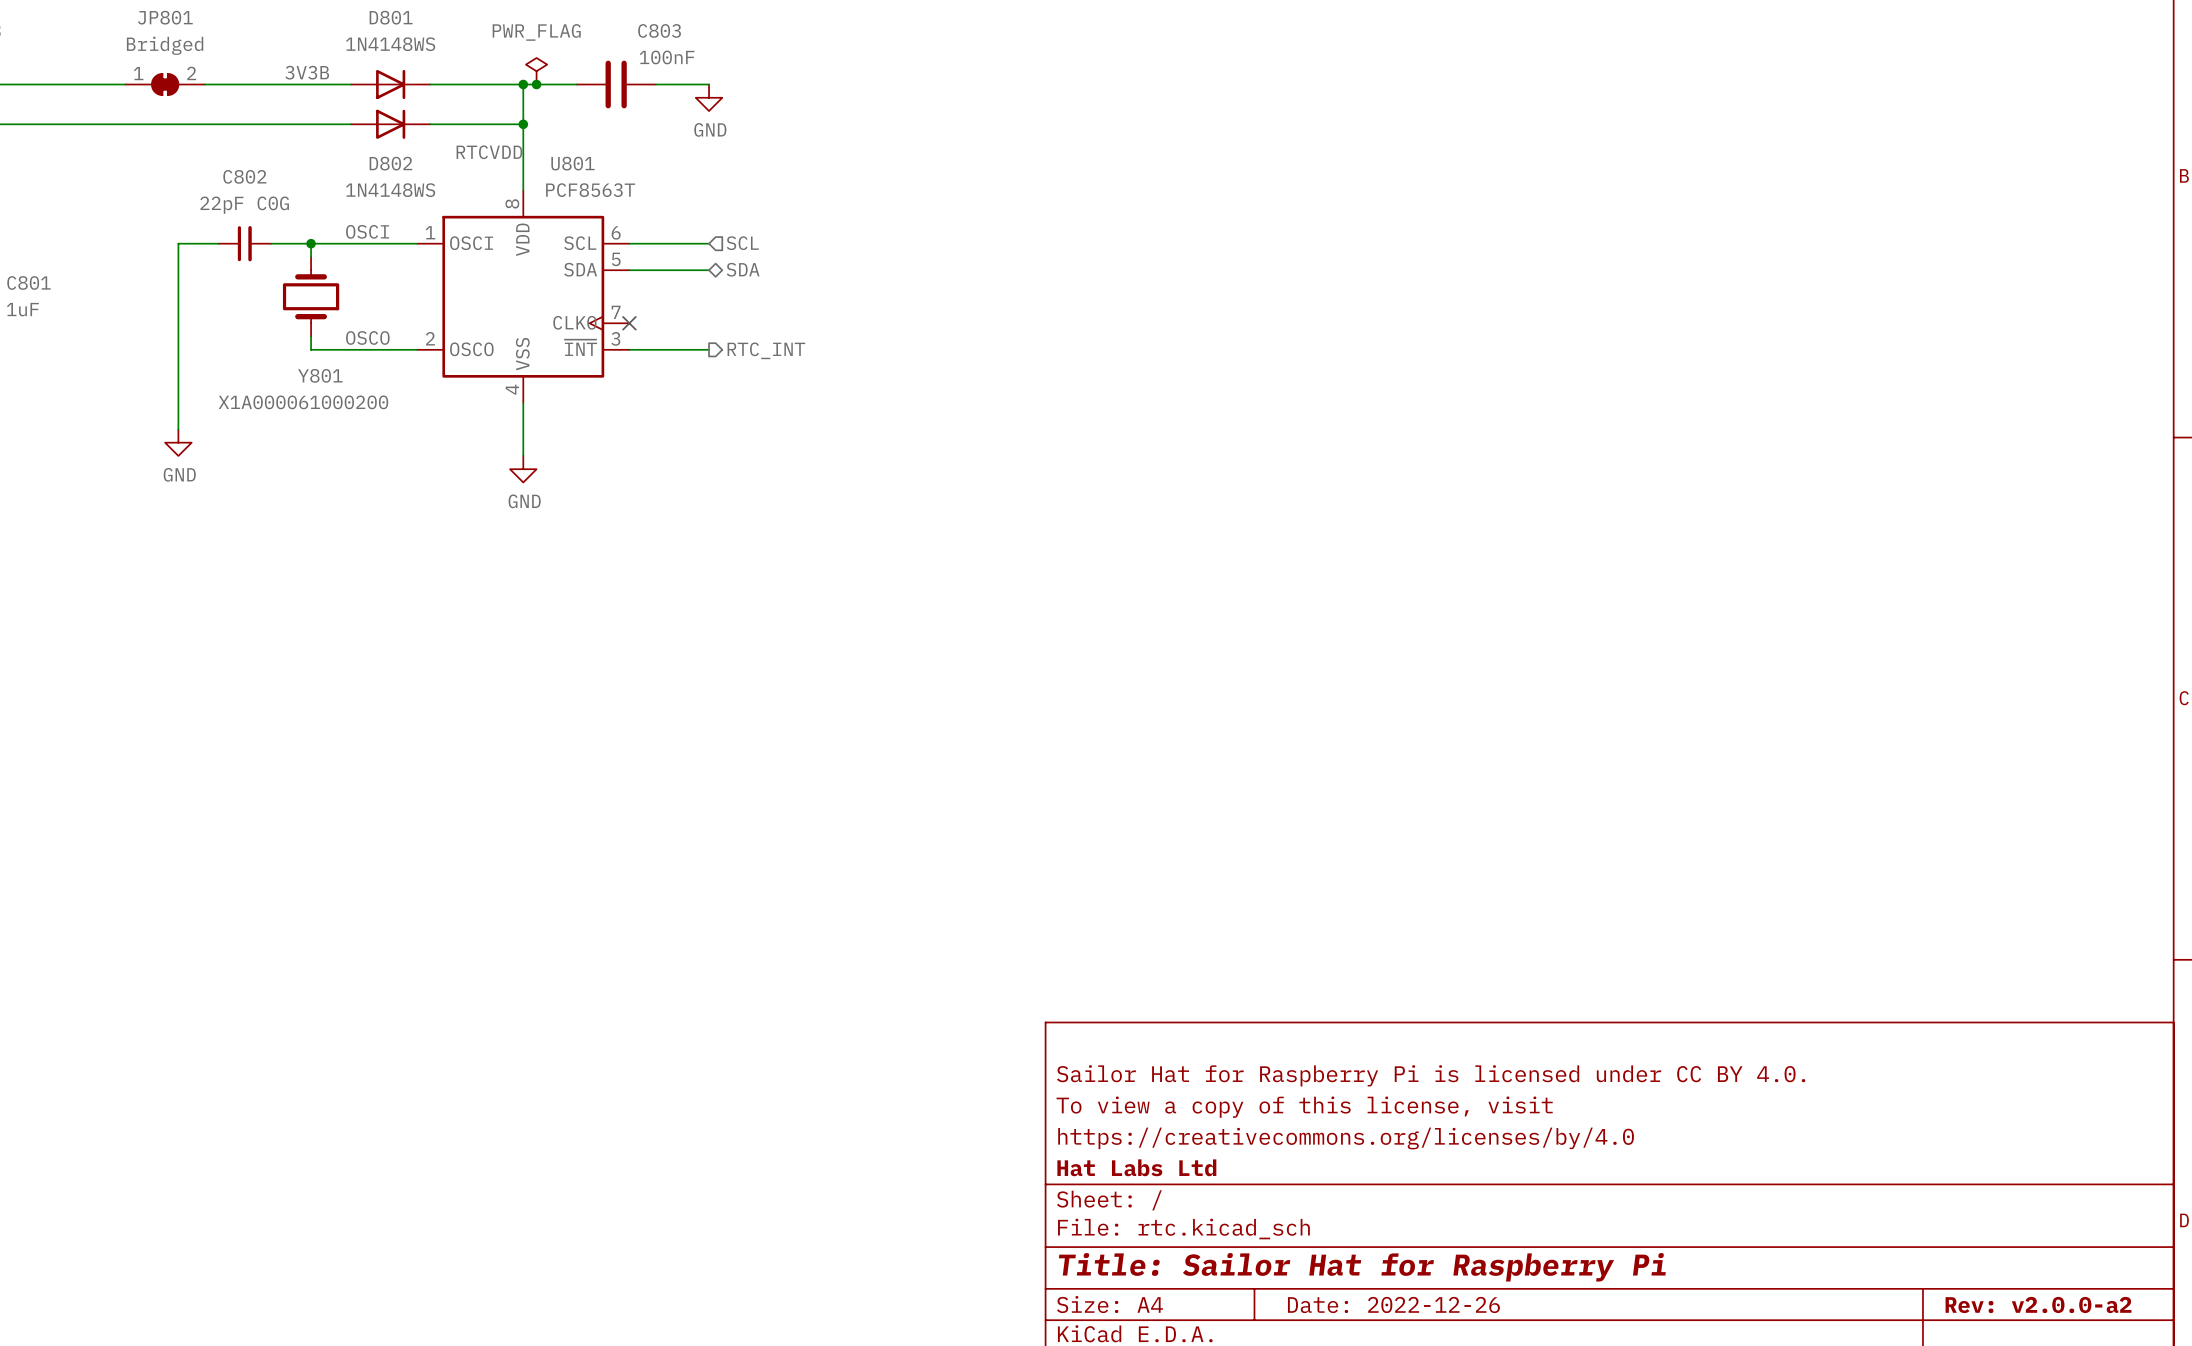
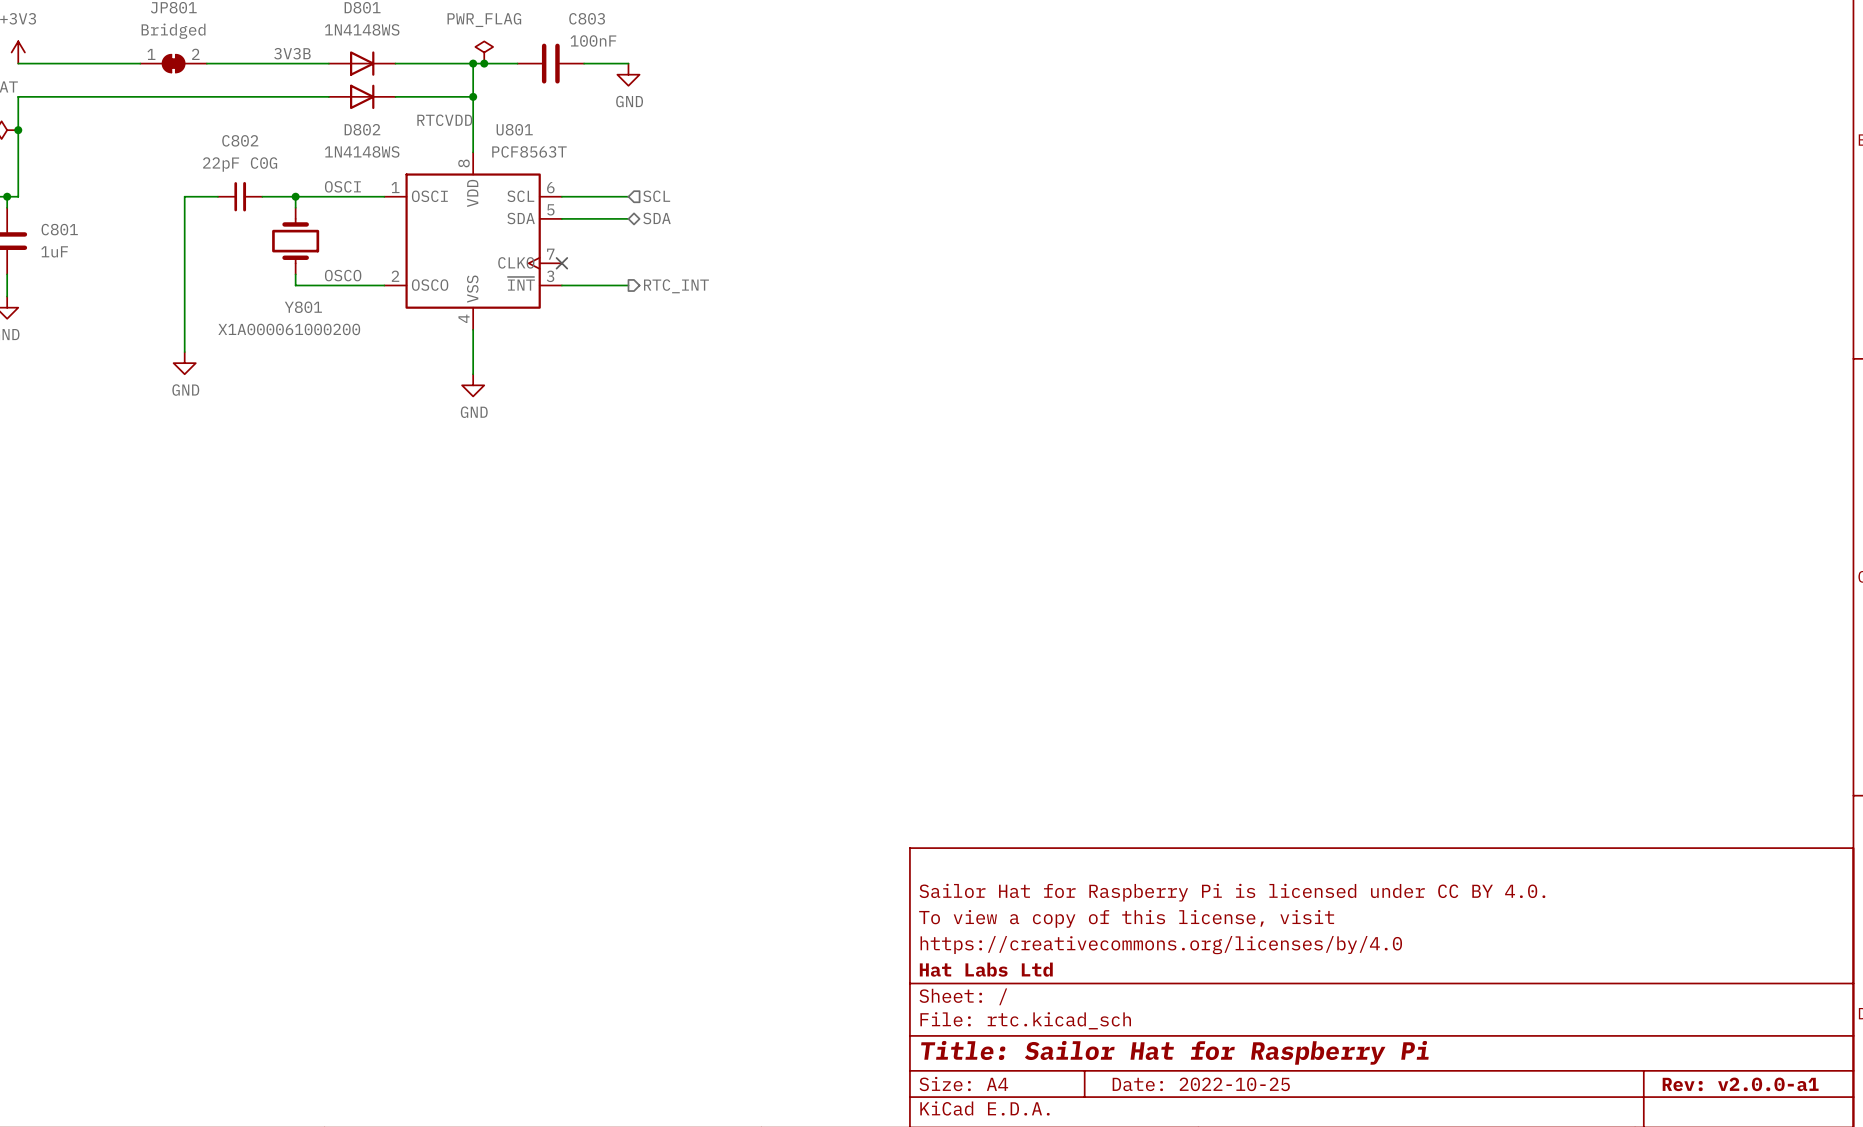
title block: Date: 2022-12-26 (1393, 1304) -> Date: 2022-10-25 (1201, 1084)
title block: Rev: v2.0.0-a2 (2038, 1304) -> Rev: v2.0.0-a1 (1740, 1084)

